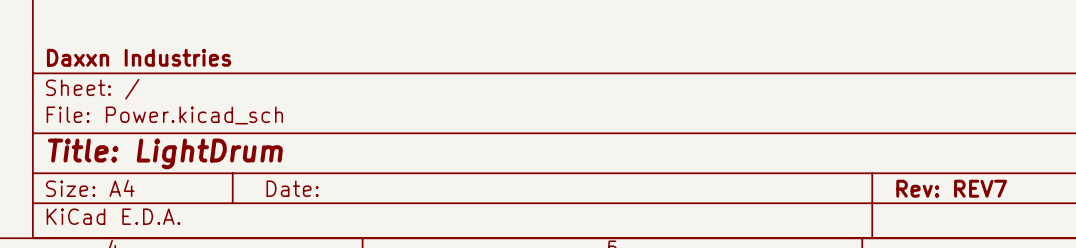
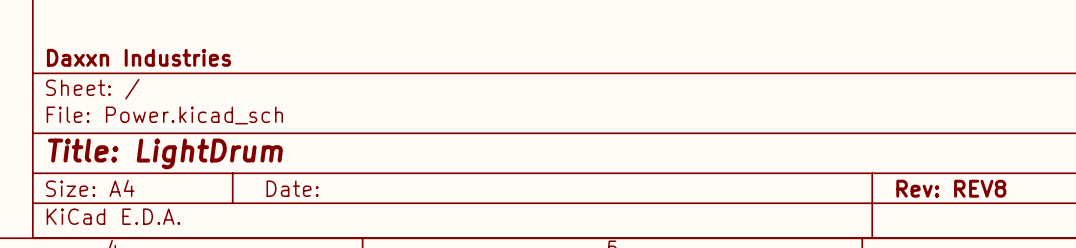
title block: Rev: REV7 (951, 188) -> Rev: REV8 (951, 188)

